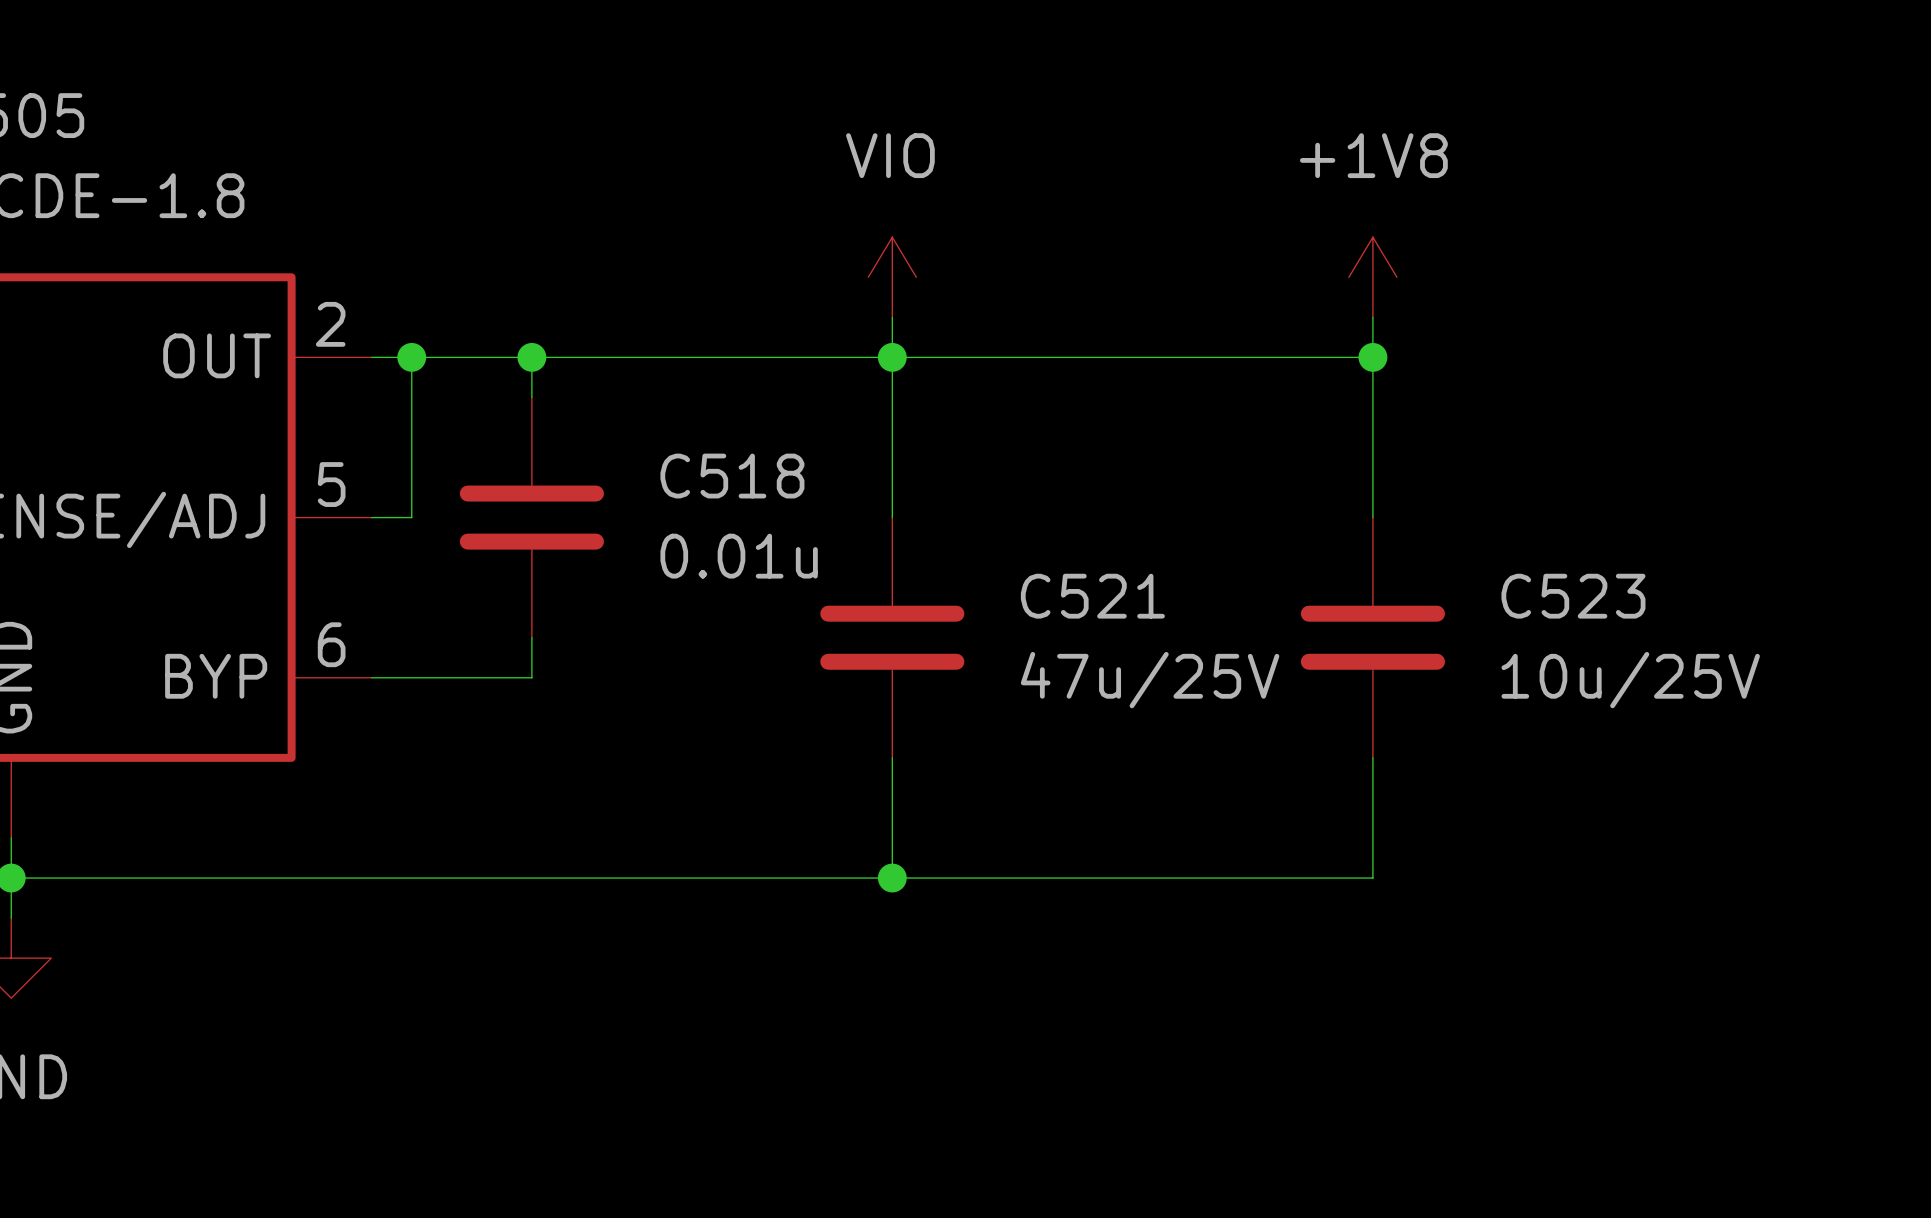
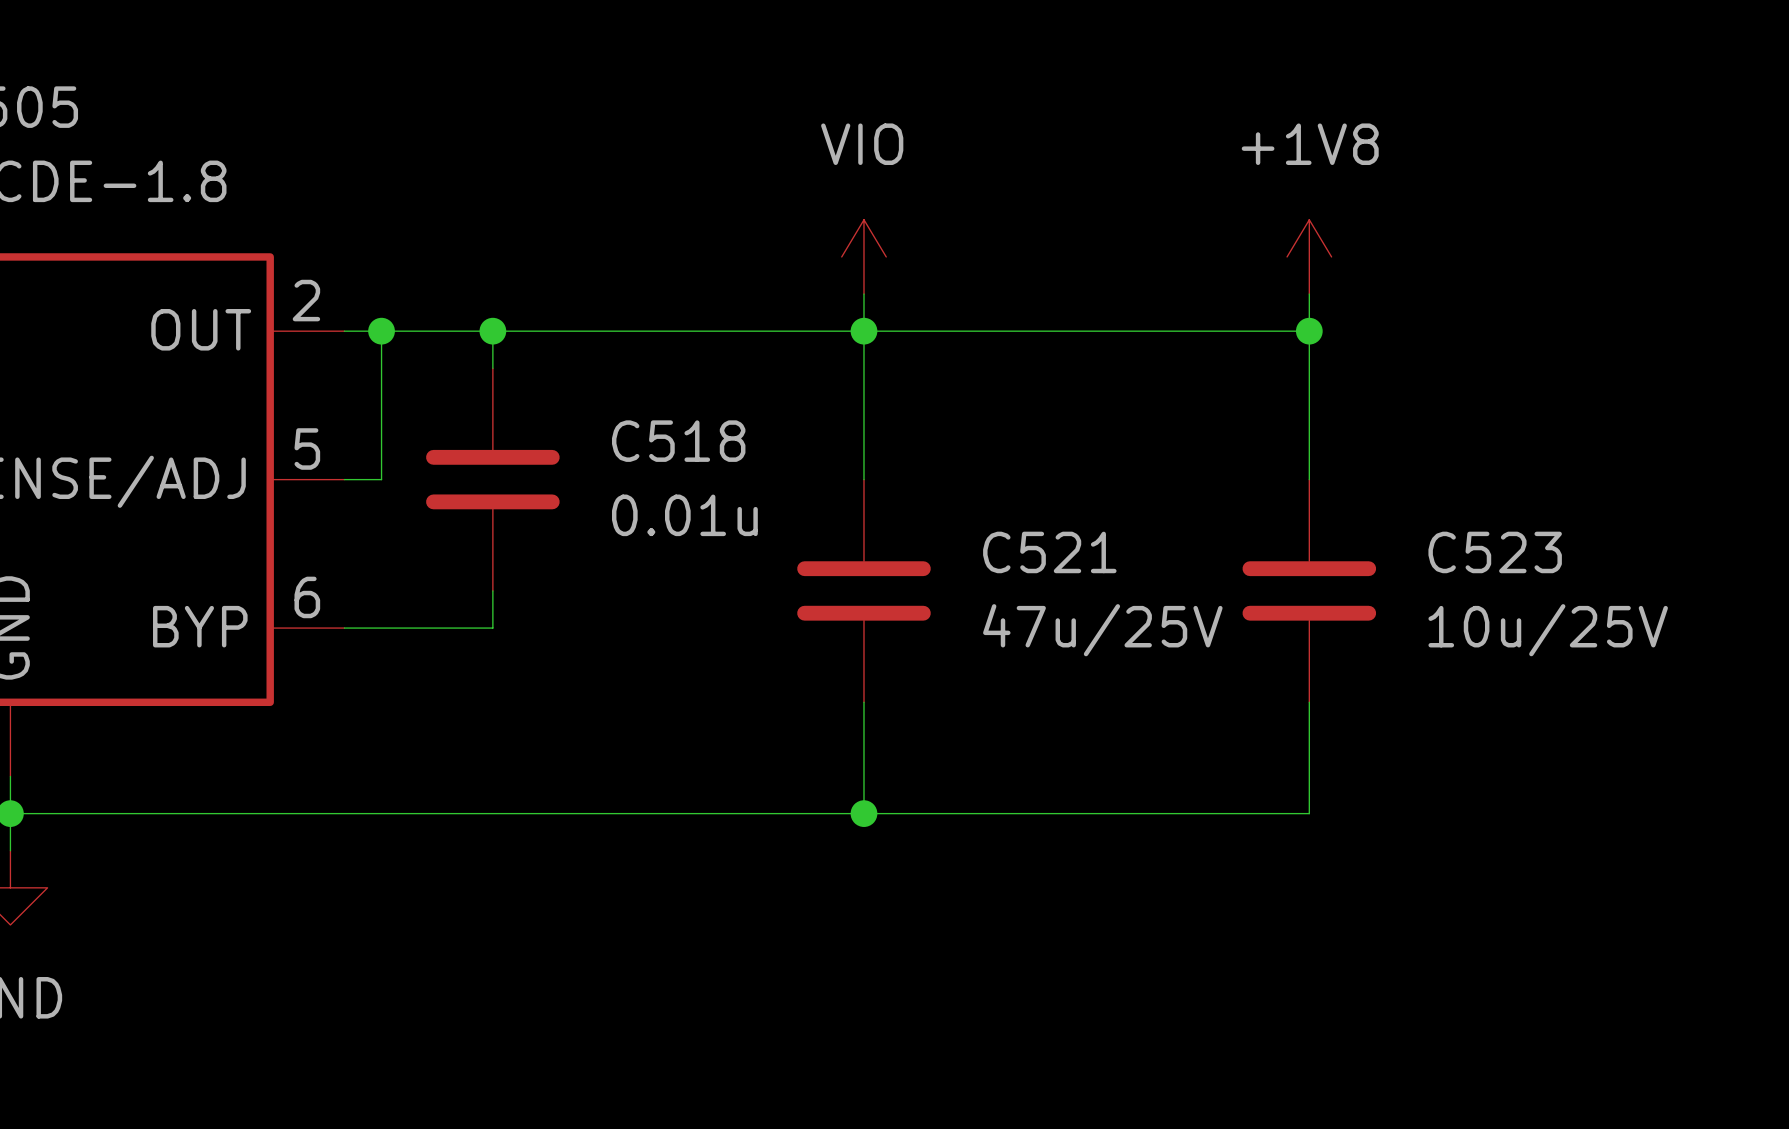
power symbol position: VIO (892, 277) -> VIO (863, 256)
power symbol position: +1V8 (1372, 277) -> +1V8 (1309, 256)
wire: (892, 317) (892, 517) -> (863, 294) (863, 479)
wire: (1372, 317) (1372, 517) -> (1309, 294) (1309, 479)
junction position: (892, 357) -> (863, 331)
wire: none -> (1272, 331) (1309, 331)
junction position: (1372, 357) -> (1309, 331)
C521 position: (892, 637) -> (863, 590)
C523 position: (1372, 637) -> (1309, 590)
wire: (892, 757) (892, 878) -> (863, 702) (863, 813)
wire: (1372, 757) (1372, 878) -> (1309, 702) (1309, 813) (1272, 813)
junction position: (892, 878) -> (863, 813)

